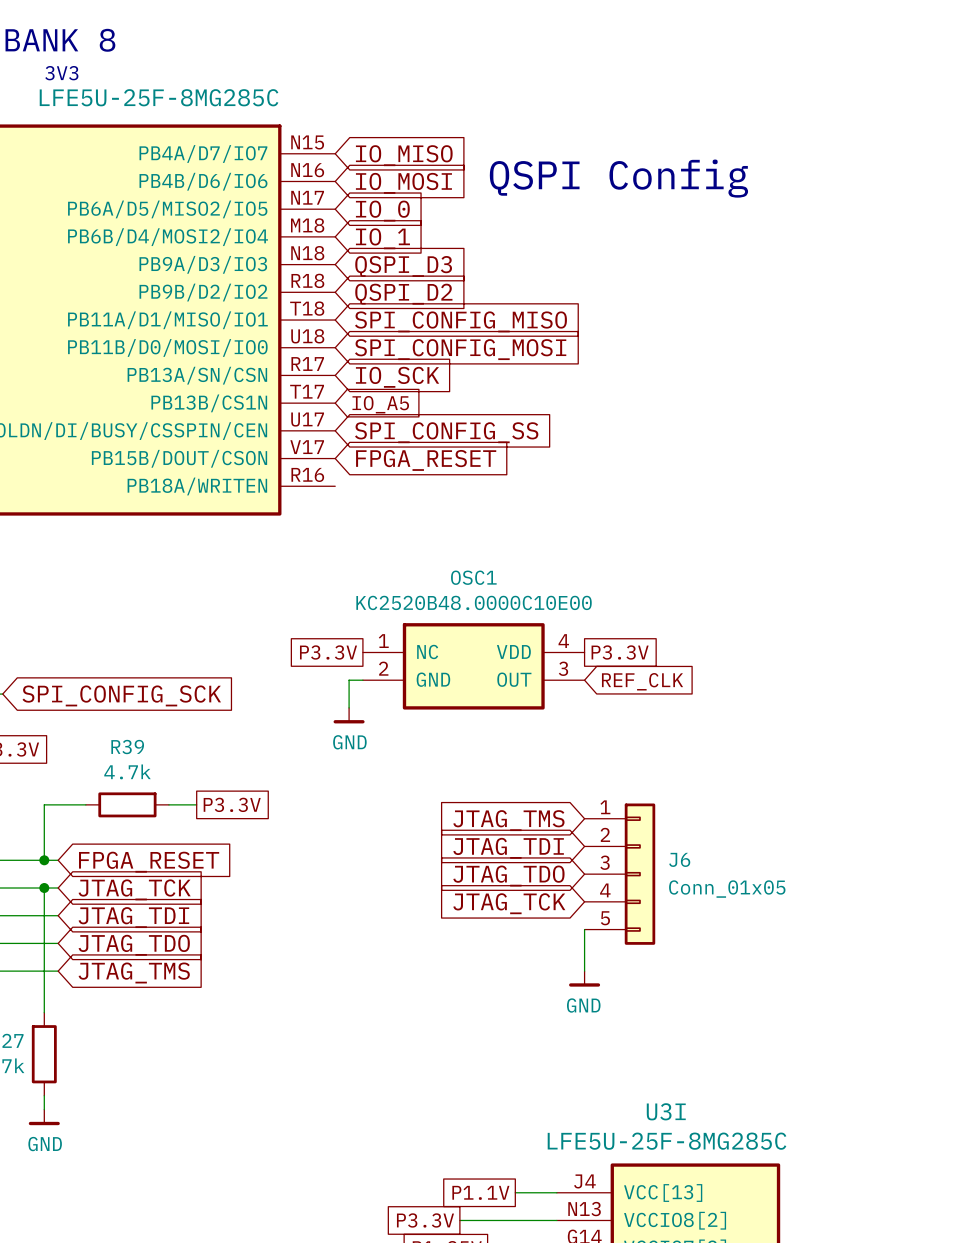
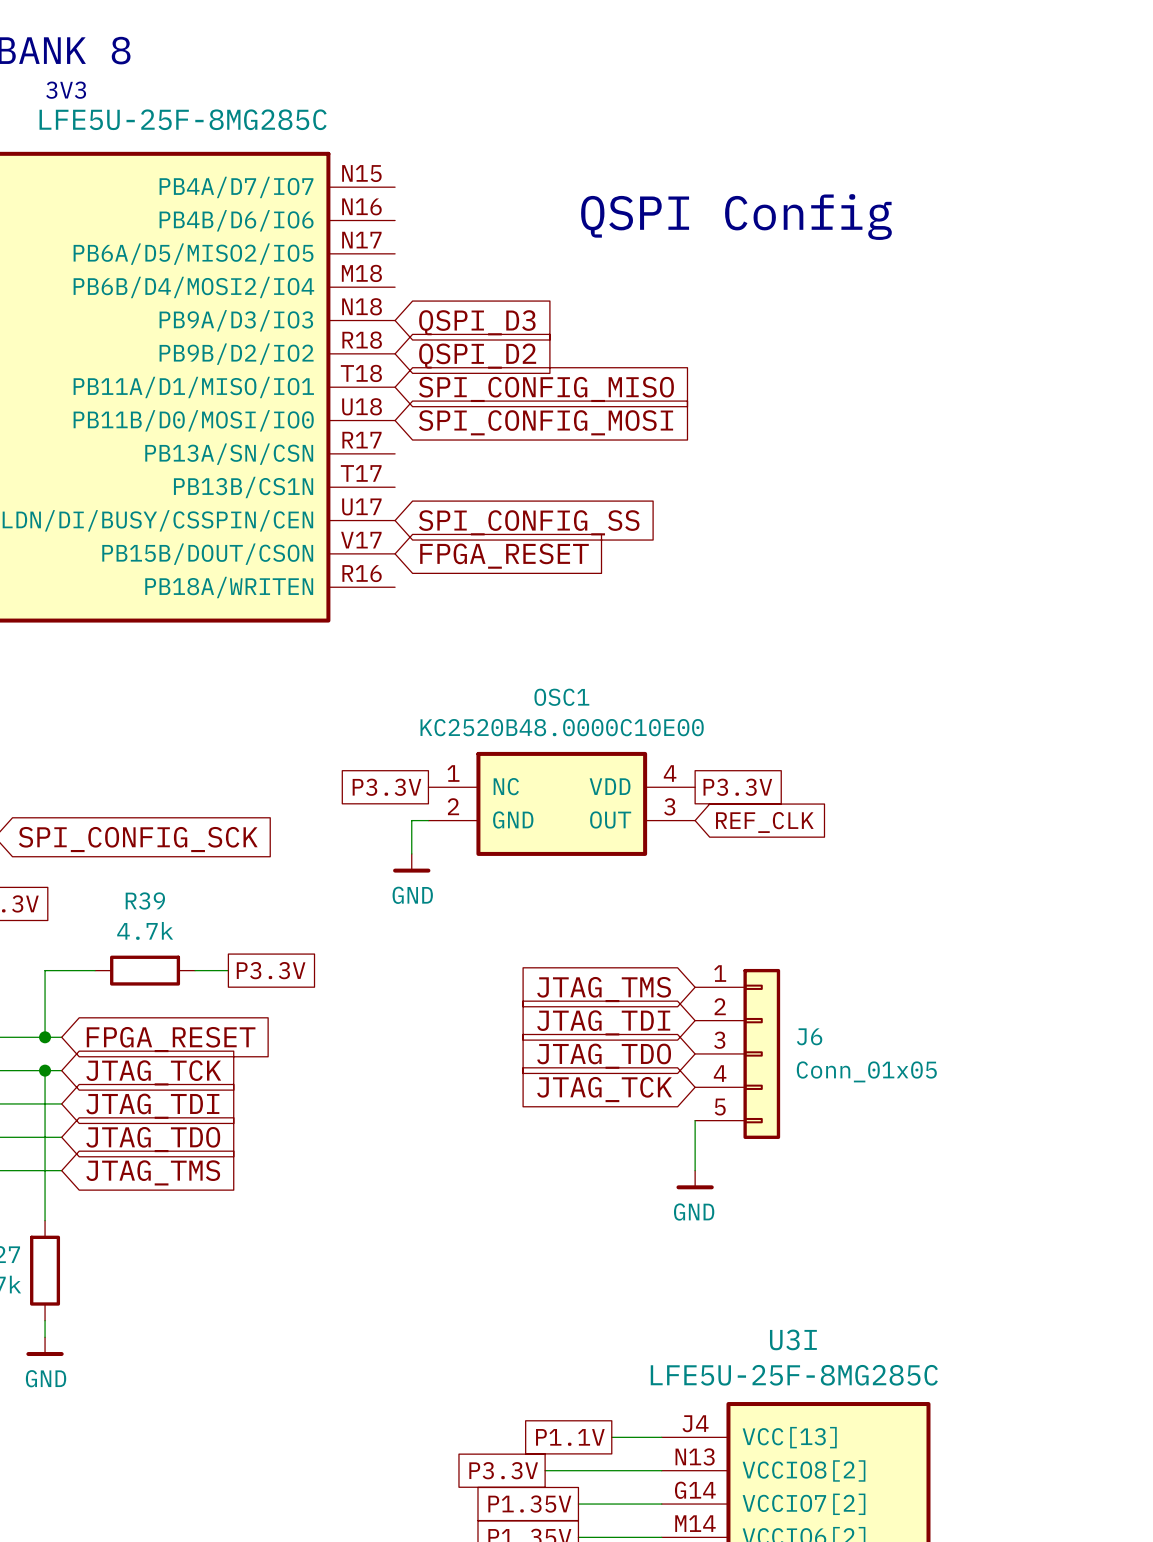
global label: IO_MISO (404, 155) -> none
global label: IO_MOSI (403, 183) -> none
global label: IO_0 (382, 211) -> none
global label: IO_1 (382, 238) -> none
global label: IO_SCK (397, 377) -> none
global label: IO_A5 (380, 404) -> none

